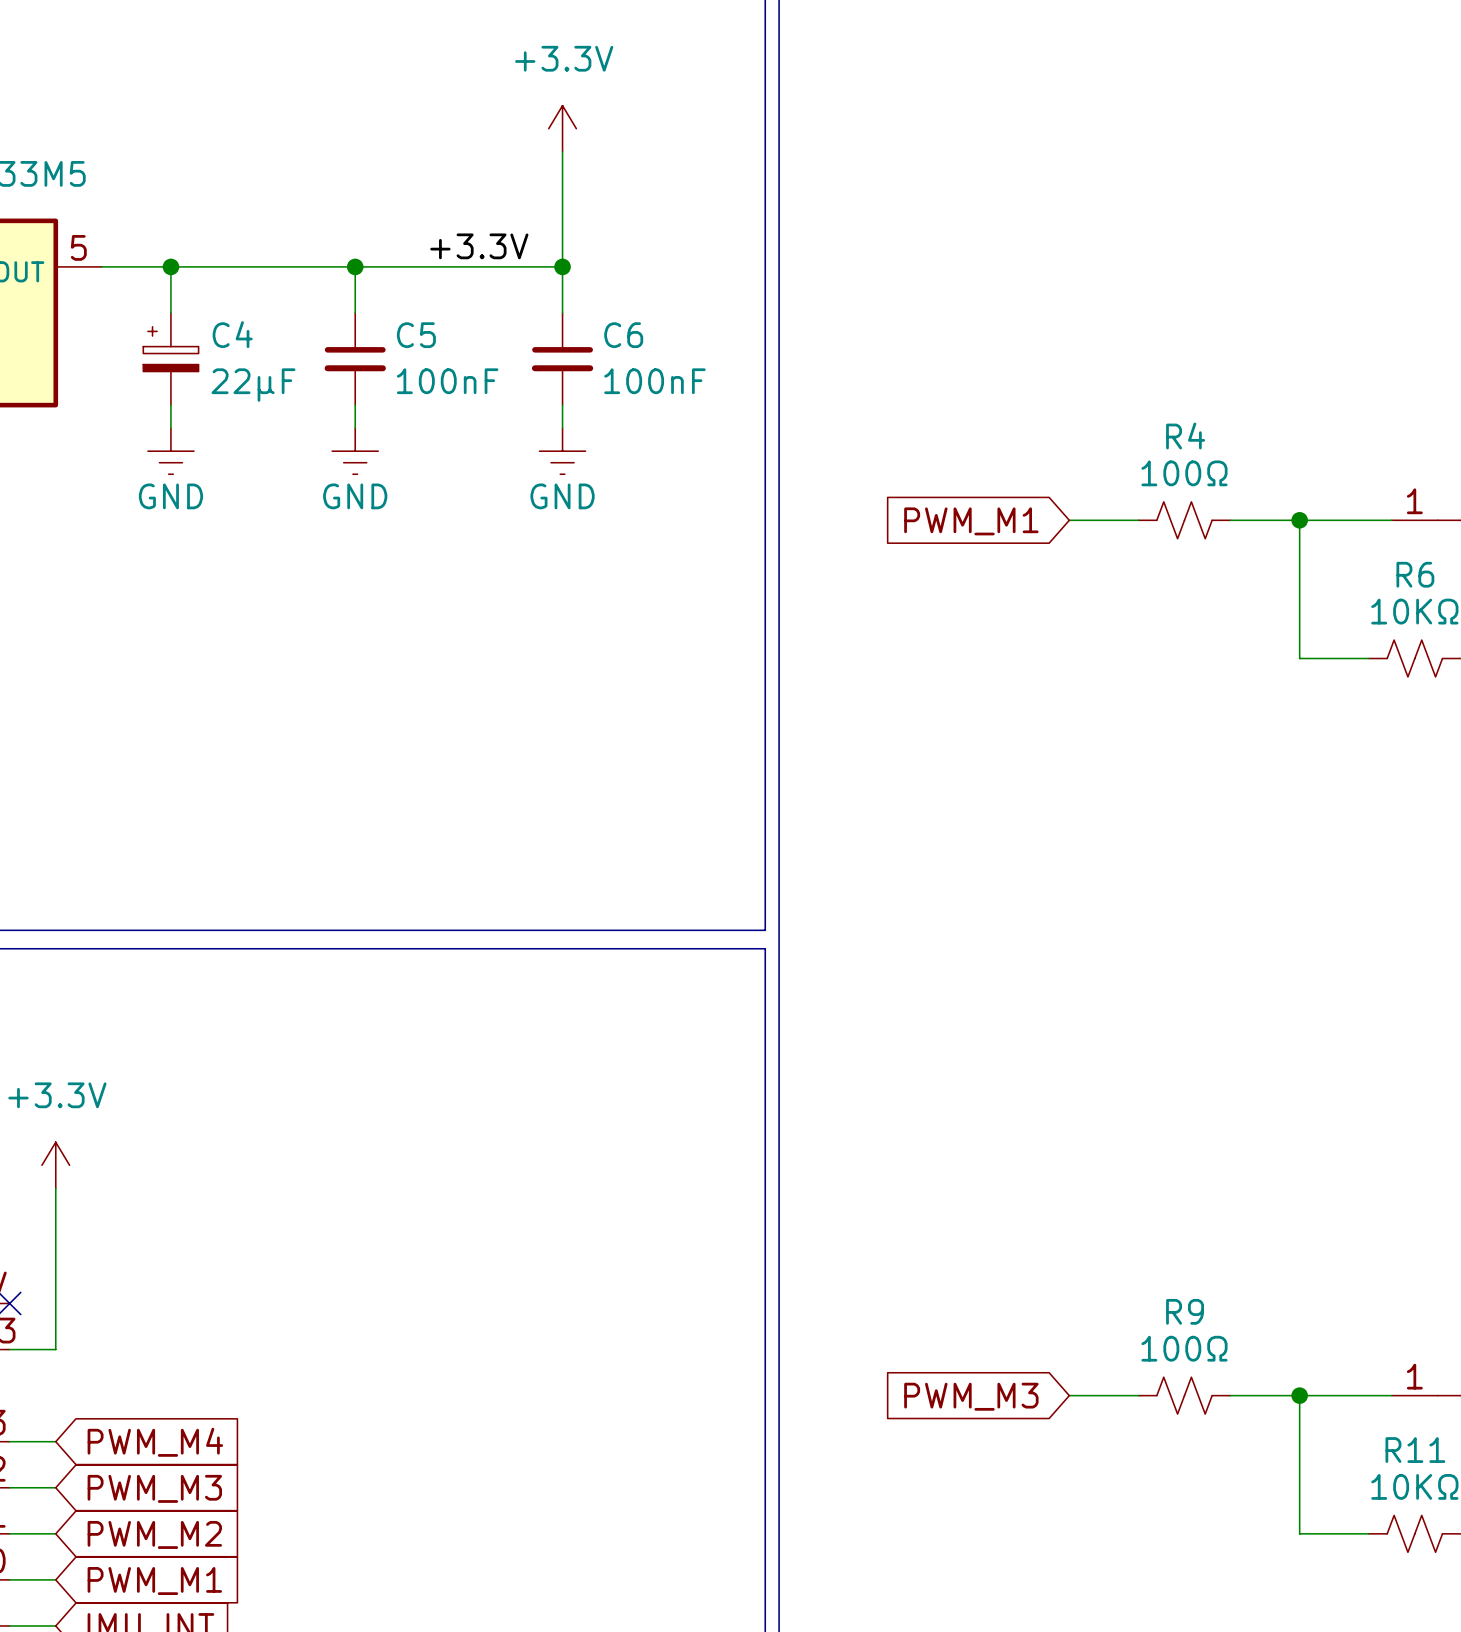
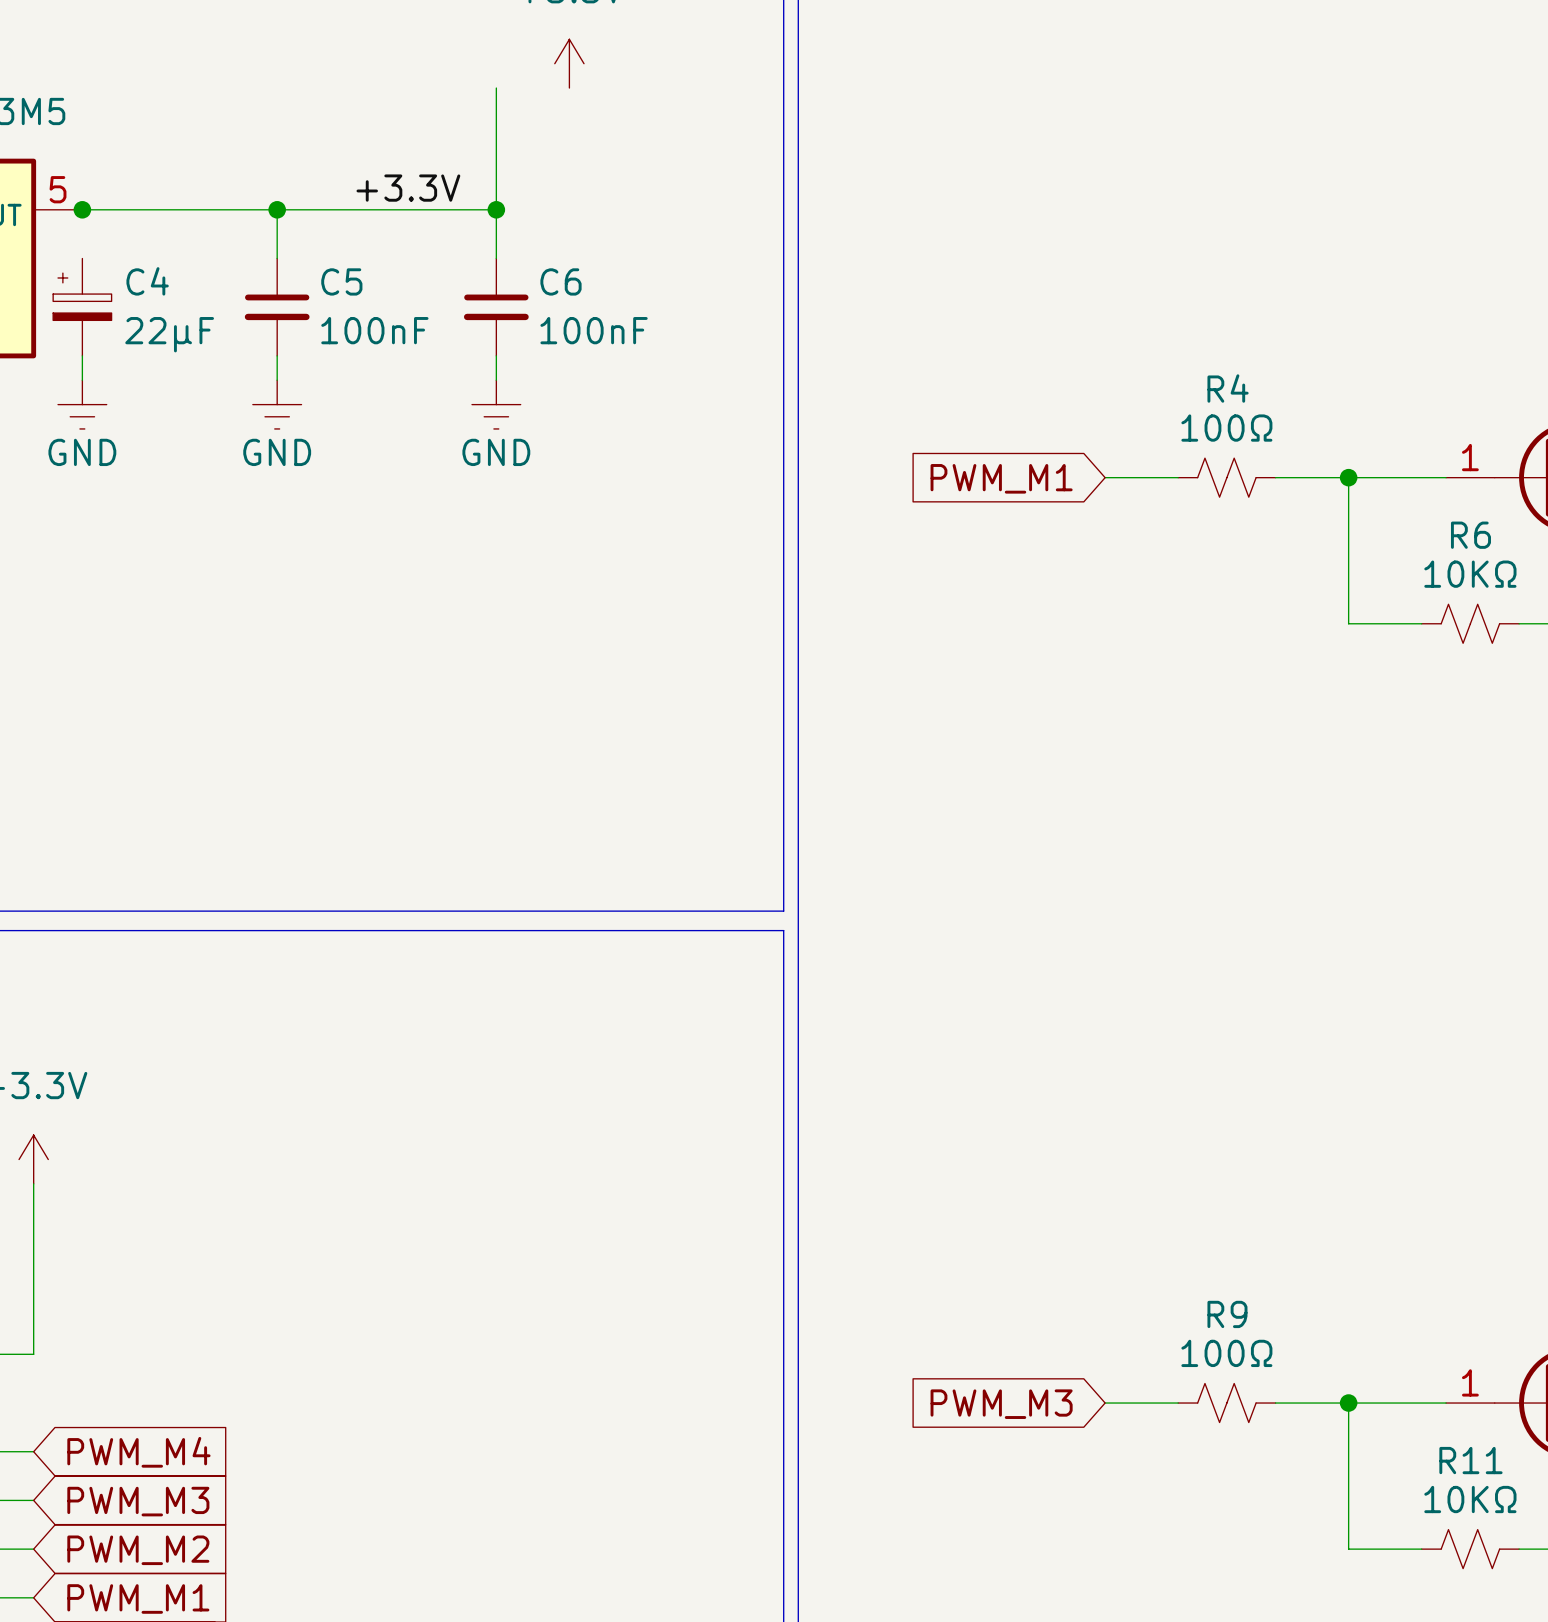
wire: (562, 151) (562, 312) -> (496, 88) (496, 258)
label position: +3.3V (479, 246) -> +3.3V (408, 188)
junction: none -> (82, 209)
wire: (170, 266) (170, 312) -> none
junction: (170, 266) -> none
junction: none -> (277, 209)
wire: (355, 266) (355, 312) -> (277, 209) (277, 258)
junction: (355, 266) -> none
wire: (493, 266) (562, 266) -> none
junction: none -> (496, 209)
junction: (562, 266) -> none
C4 position: (170, 359) -> (82, 307)
C5 position: (355, 359) -> (277, 307)
C6 position: (562, 359) -> (496, 307)
wire: (170, 405) (170, 428) -> (82, 355) (82, 380)
wire: (355, 405) (355, 428) -> (277, 355) (277, 380)
wire: (562, 405) (562, 428) -> (496, 355) (496, 380)
power symbol: none -> GND (82, 404)
power symbol: GND (170, 451) -> none
power symbol: none -> GND (277, 404)
power symbol: GND (355, 451) -> none
power symbol: none -> GND (496, 404)
power symbol: GND (562, 451) -> none

